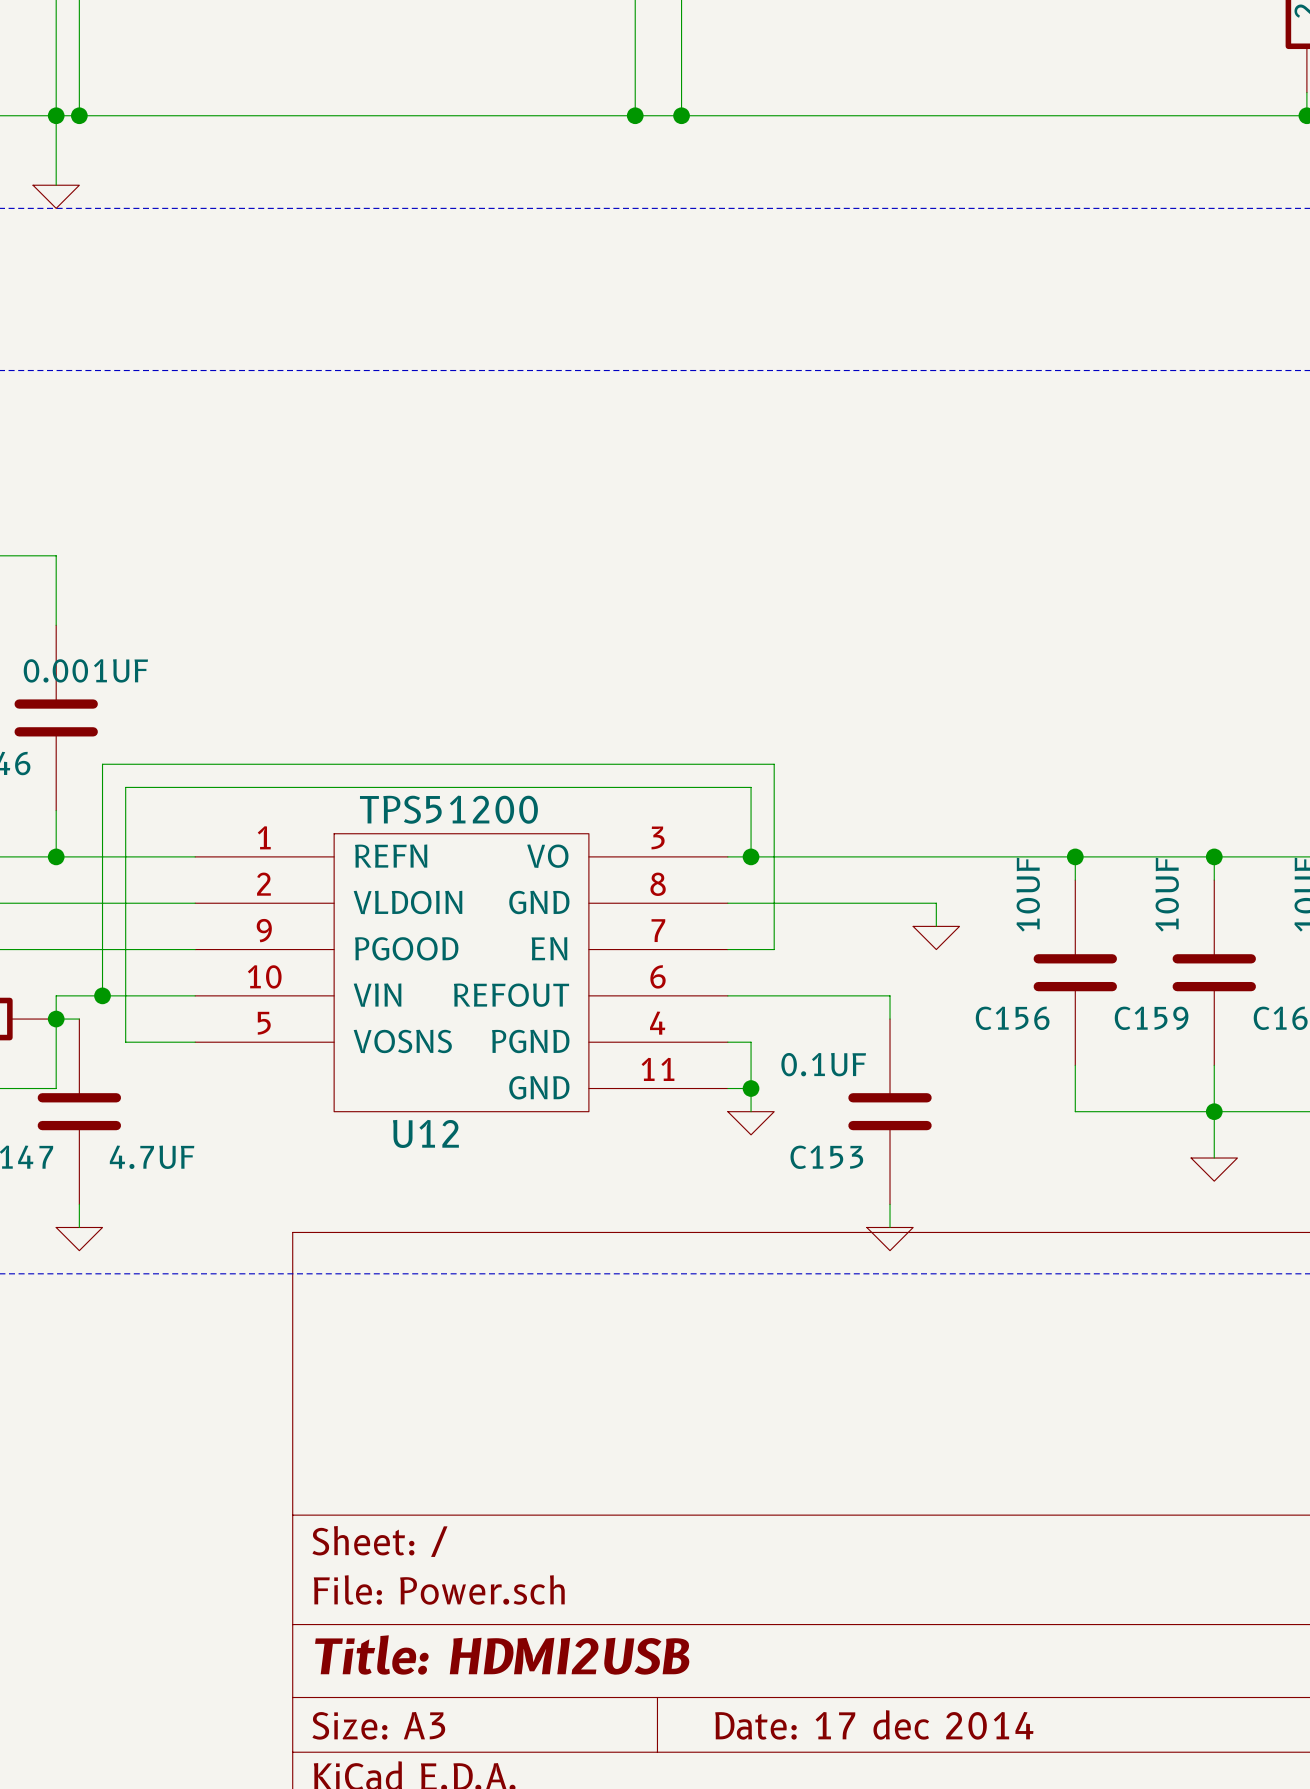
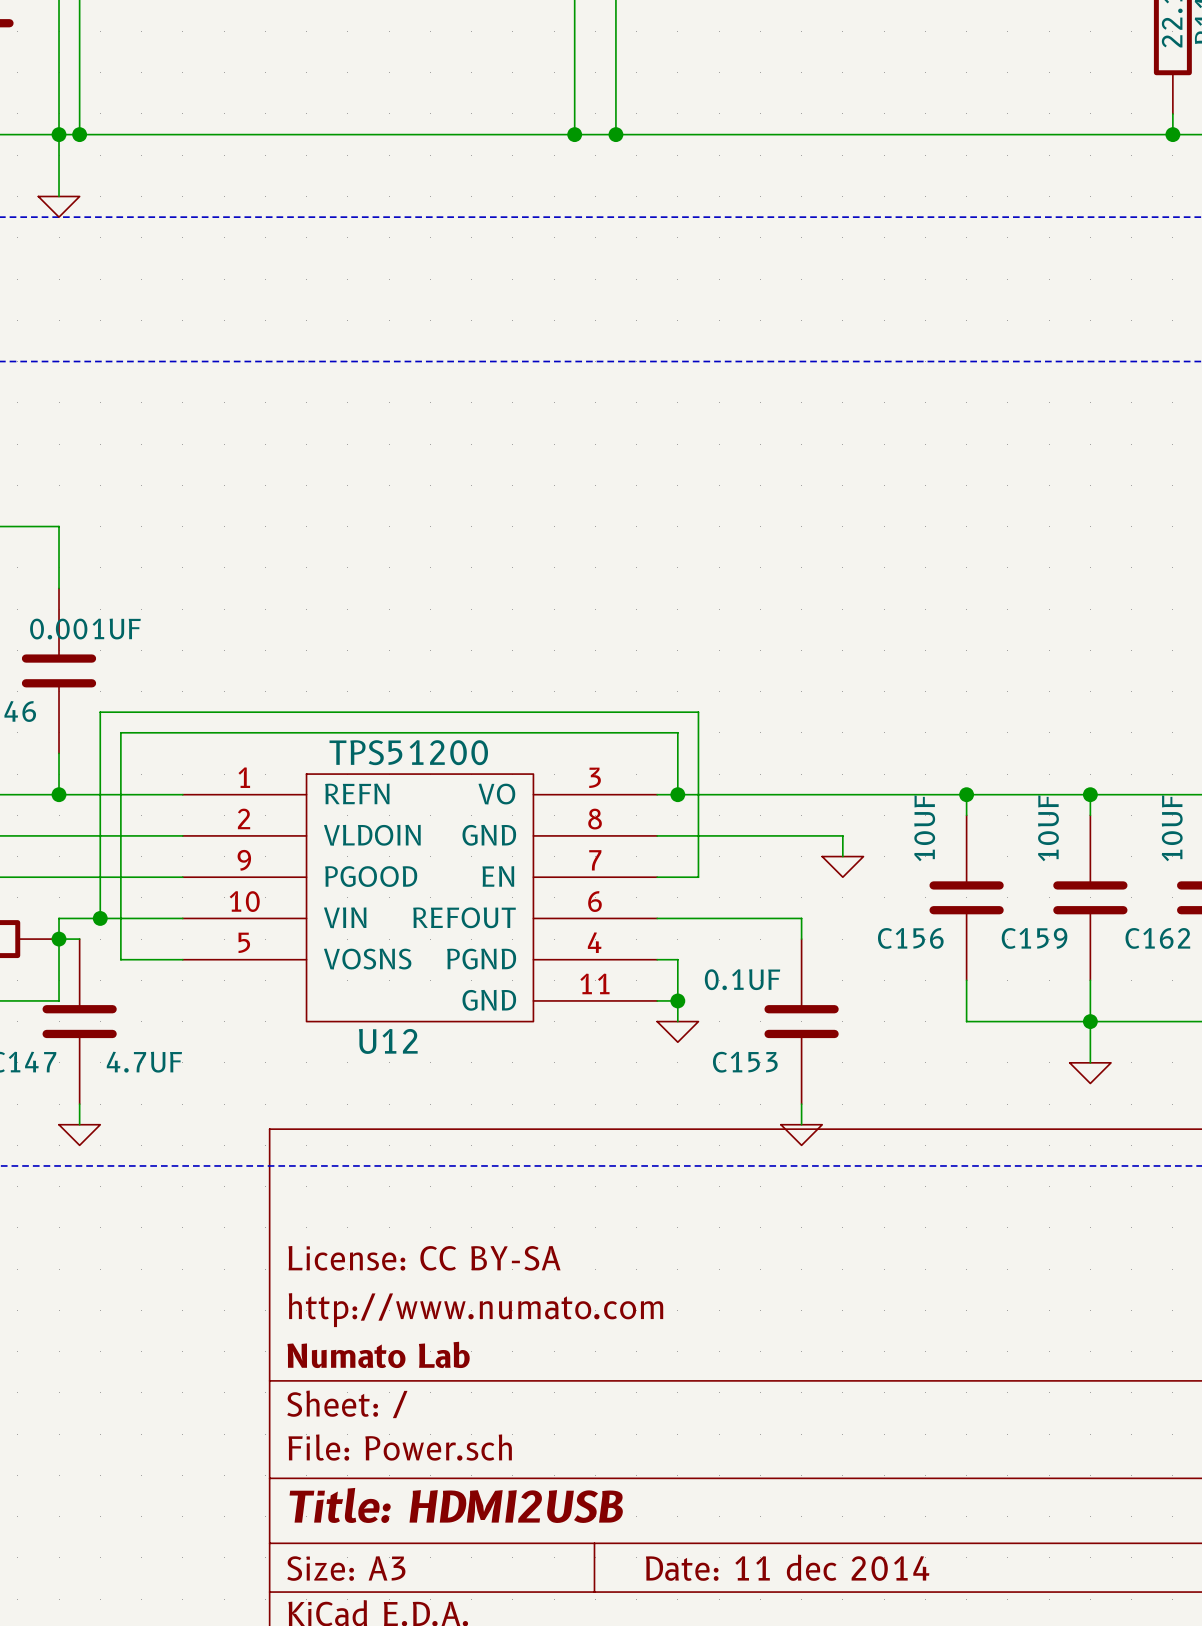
title block: none -> License: CC BY-SA (424, 1258)
title block: none -> http://www.numato.com (475, 1310)
title block: none -> Numato Lab (378, 1354)
title block: Date: 17 dec 2014 (874, 1724) -> Date: 11 dec 2014 (787, 1567)

